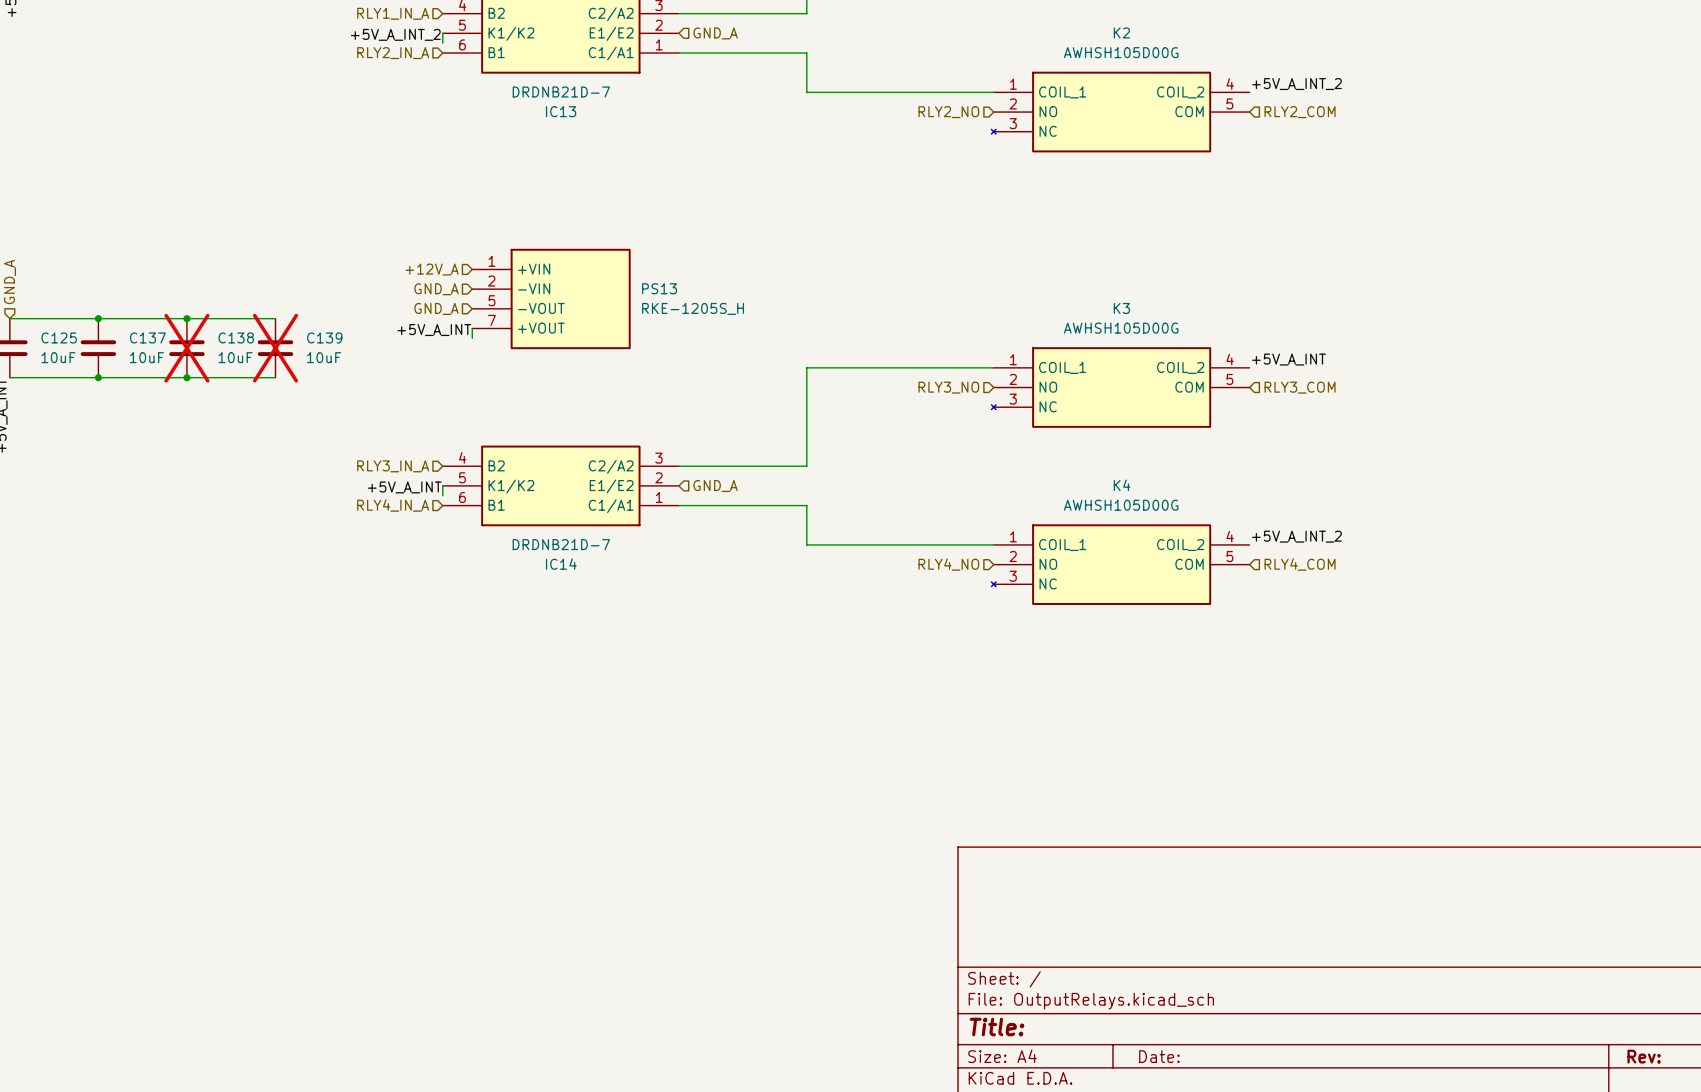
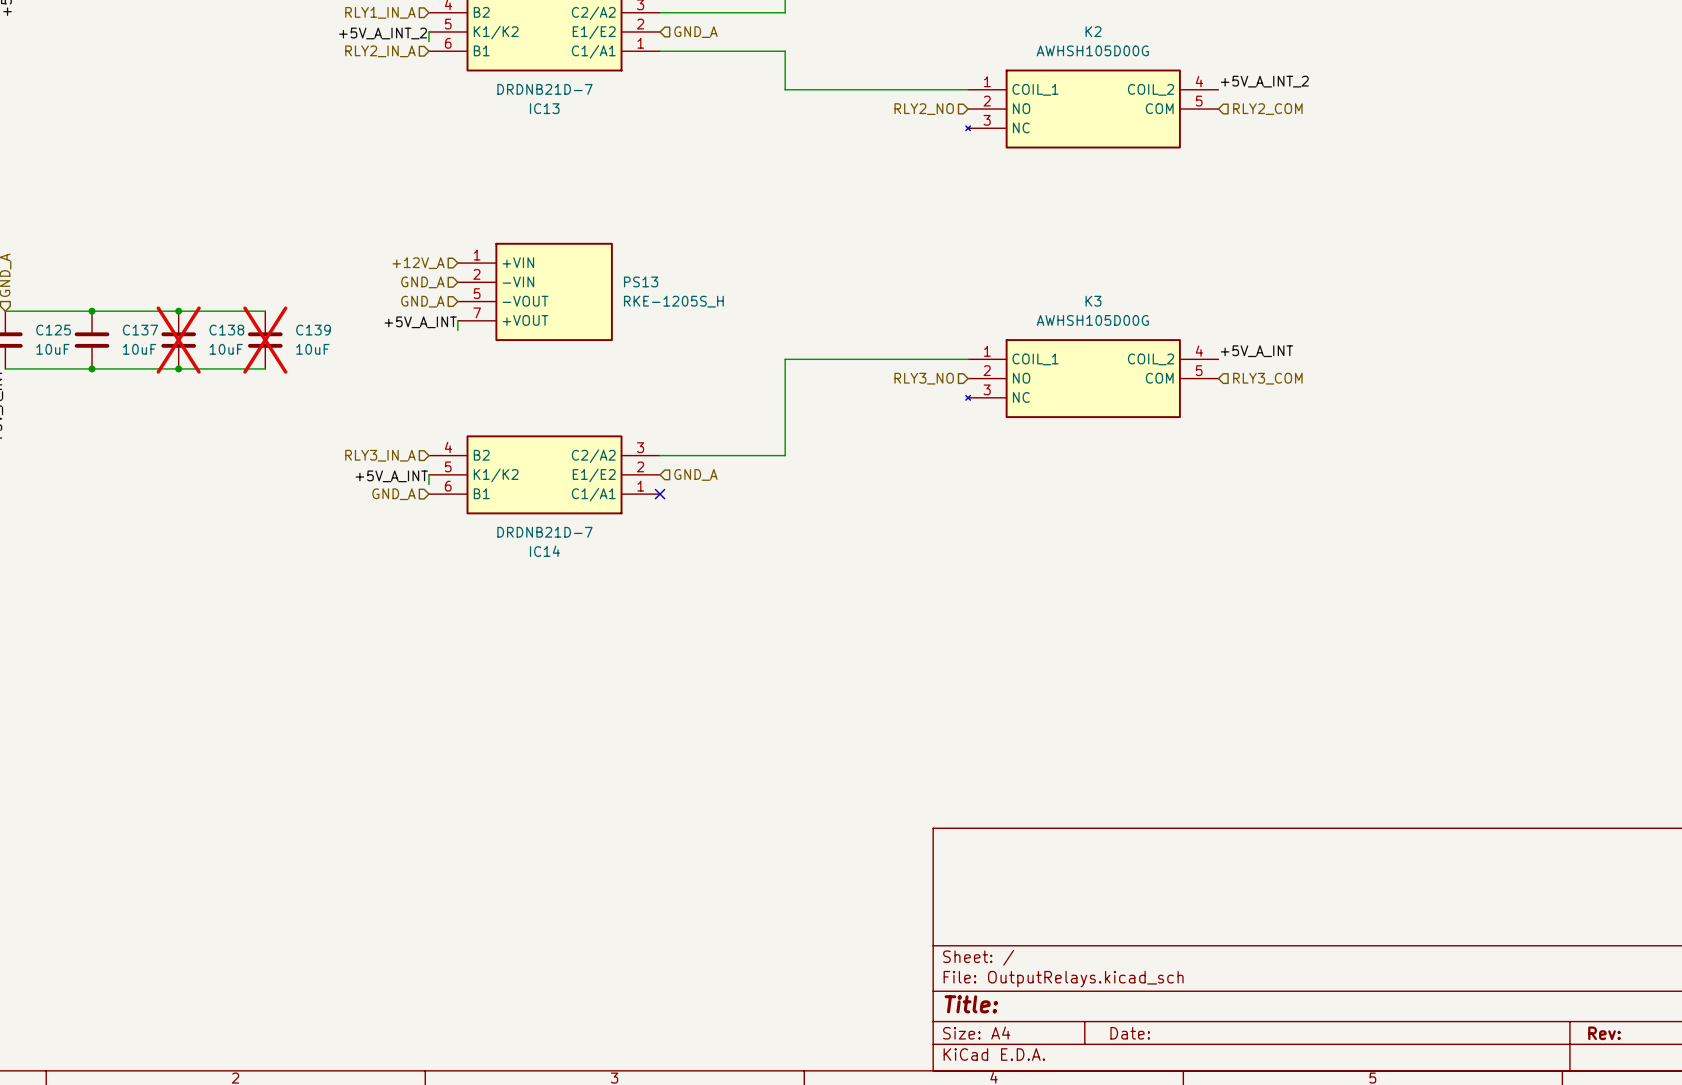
hierarchical label: RLY4_IN_A (393, 505) -> GND_A (393, 494)
wire: (678, 505) (806, 505) (806, 544) (993, 544) -> none
no-connect mark: none -> (660, 494)
label: +5V_A_INT_2 (1296, 536) -> none
hierarchical label: RLY4_NO (948, 564) -> none
K4: AWHSH105D00G (1120, 564) -> none
hierarchical label: RLY4_COM (1300, 564) -> none

